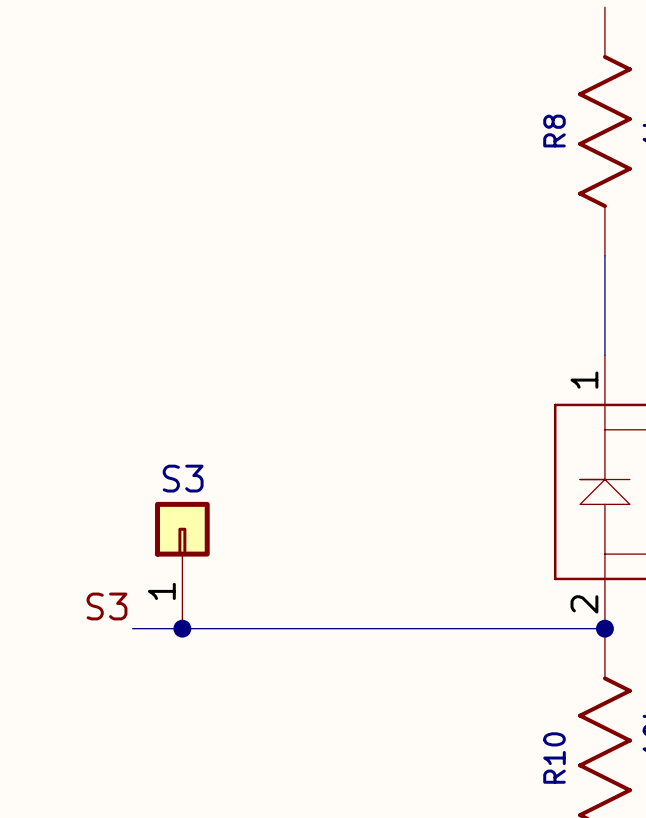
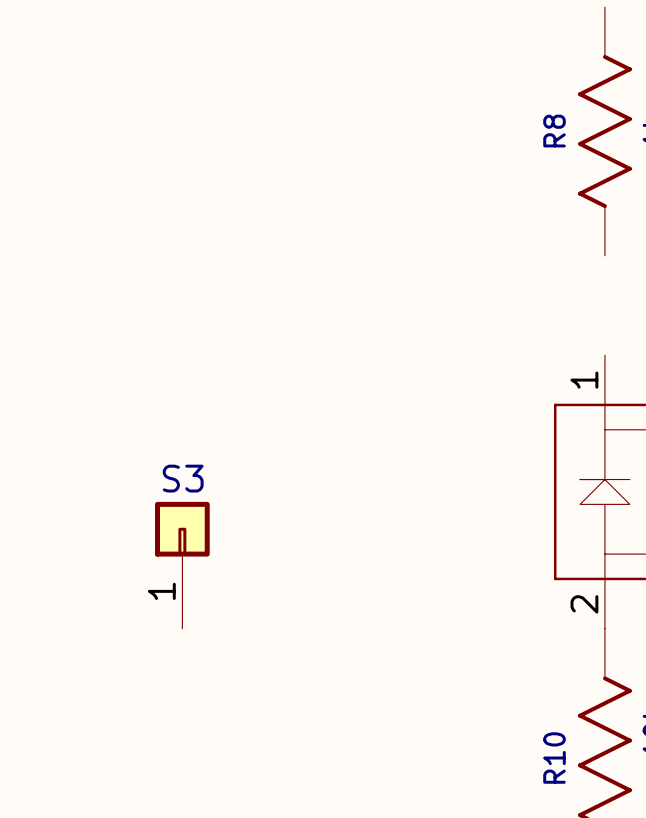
wire: (604, 255) (604, 355) -> none
label: S3 (107, 606) -> none
wire: (132, 628) (604, 628) -> none
junction: (182, 628) -> none
junction: (604, 628) -> none

